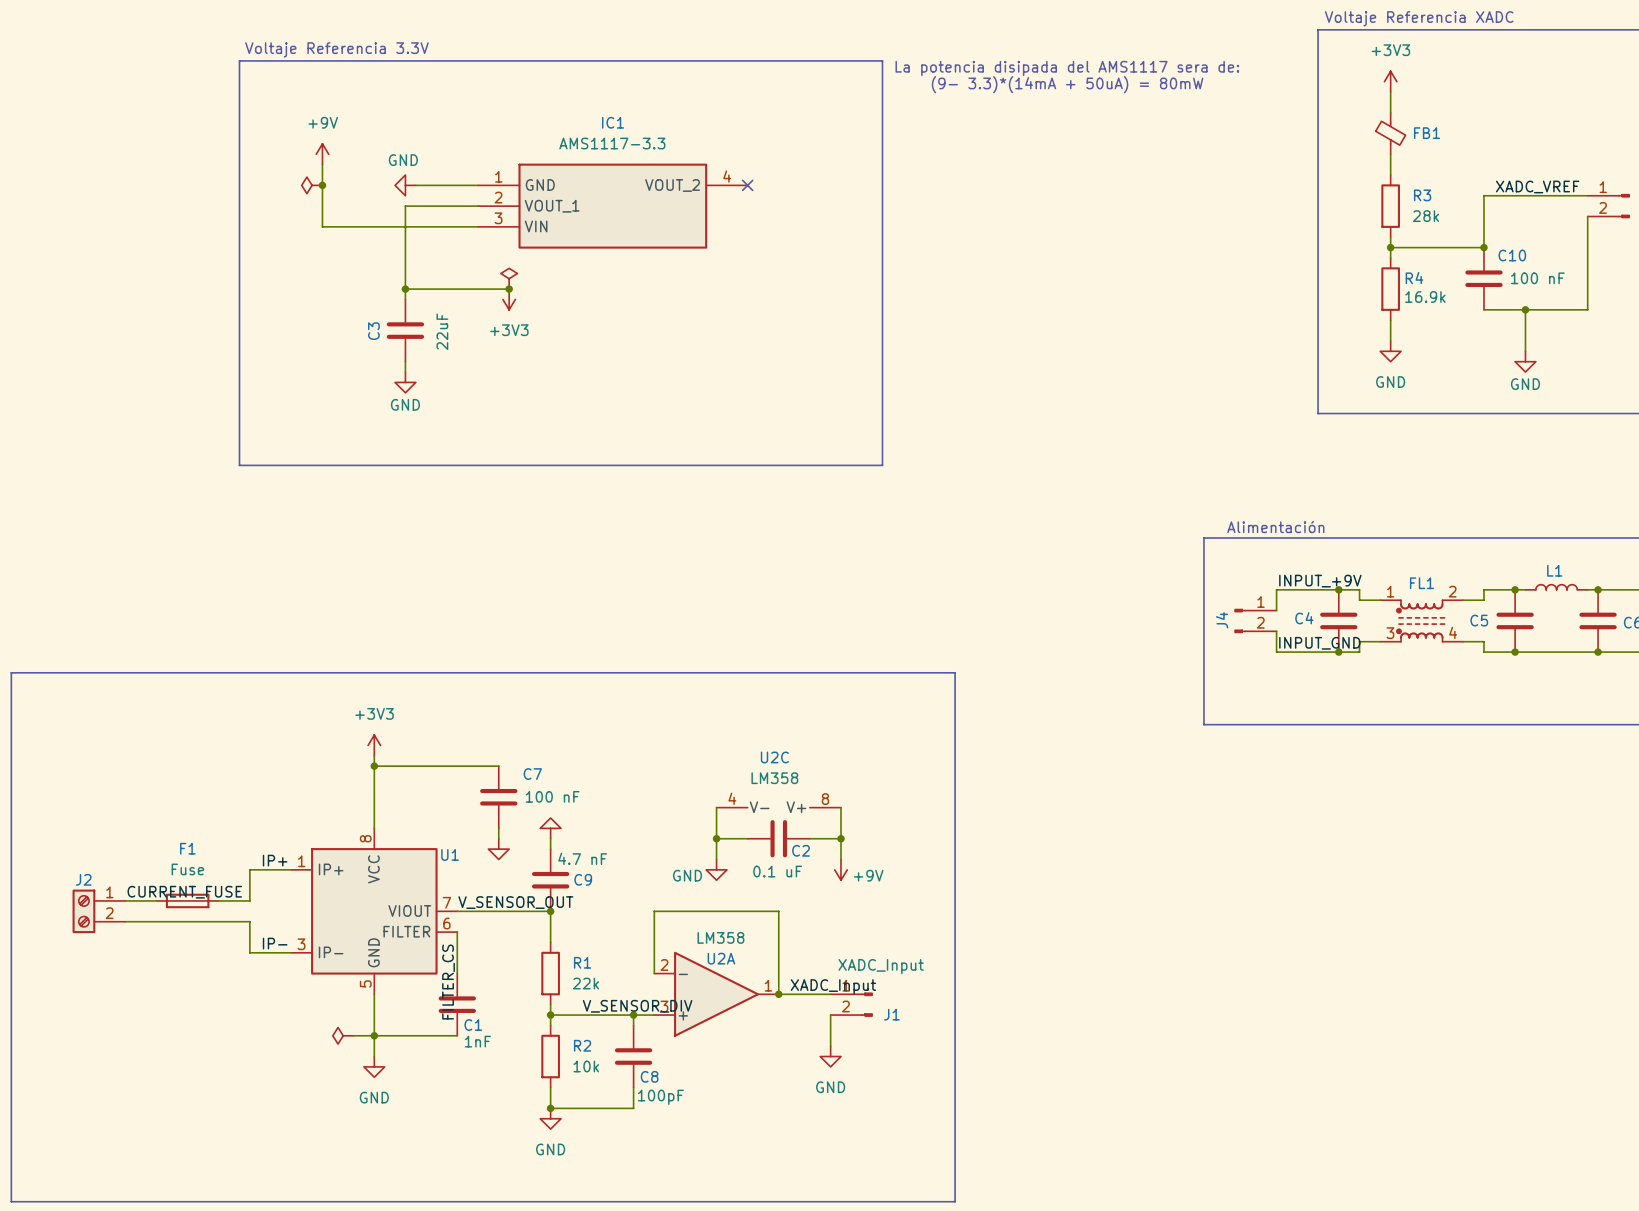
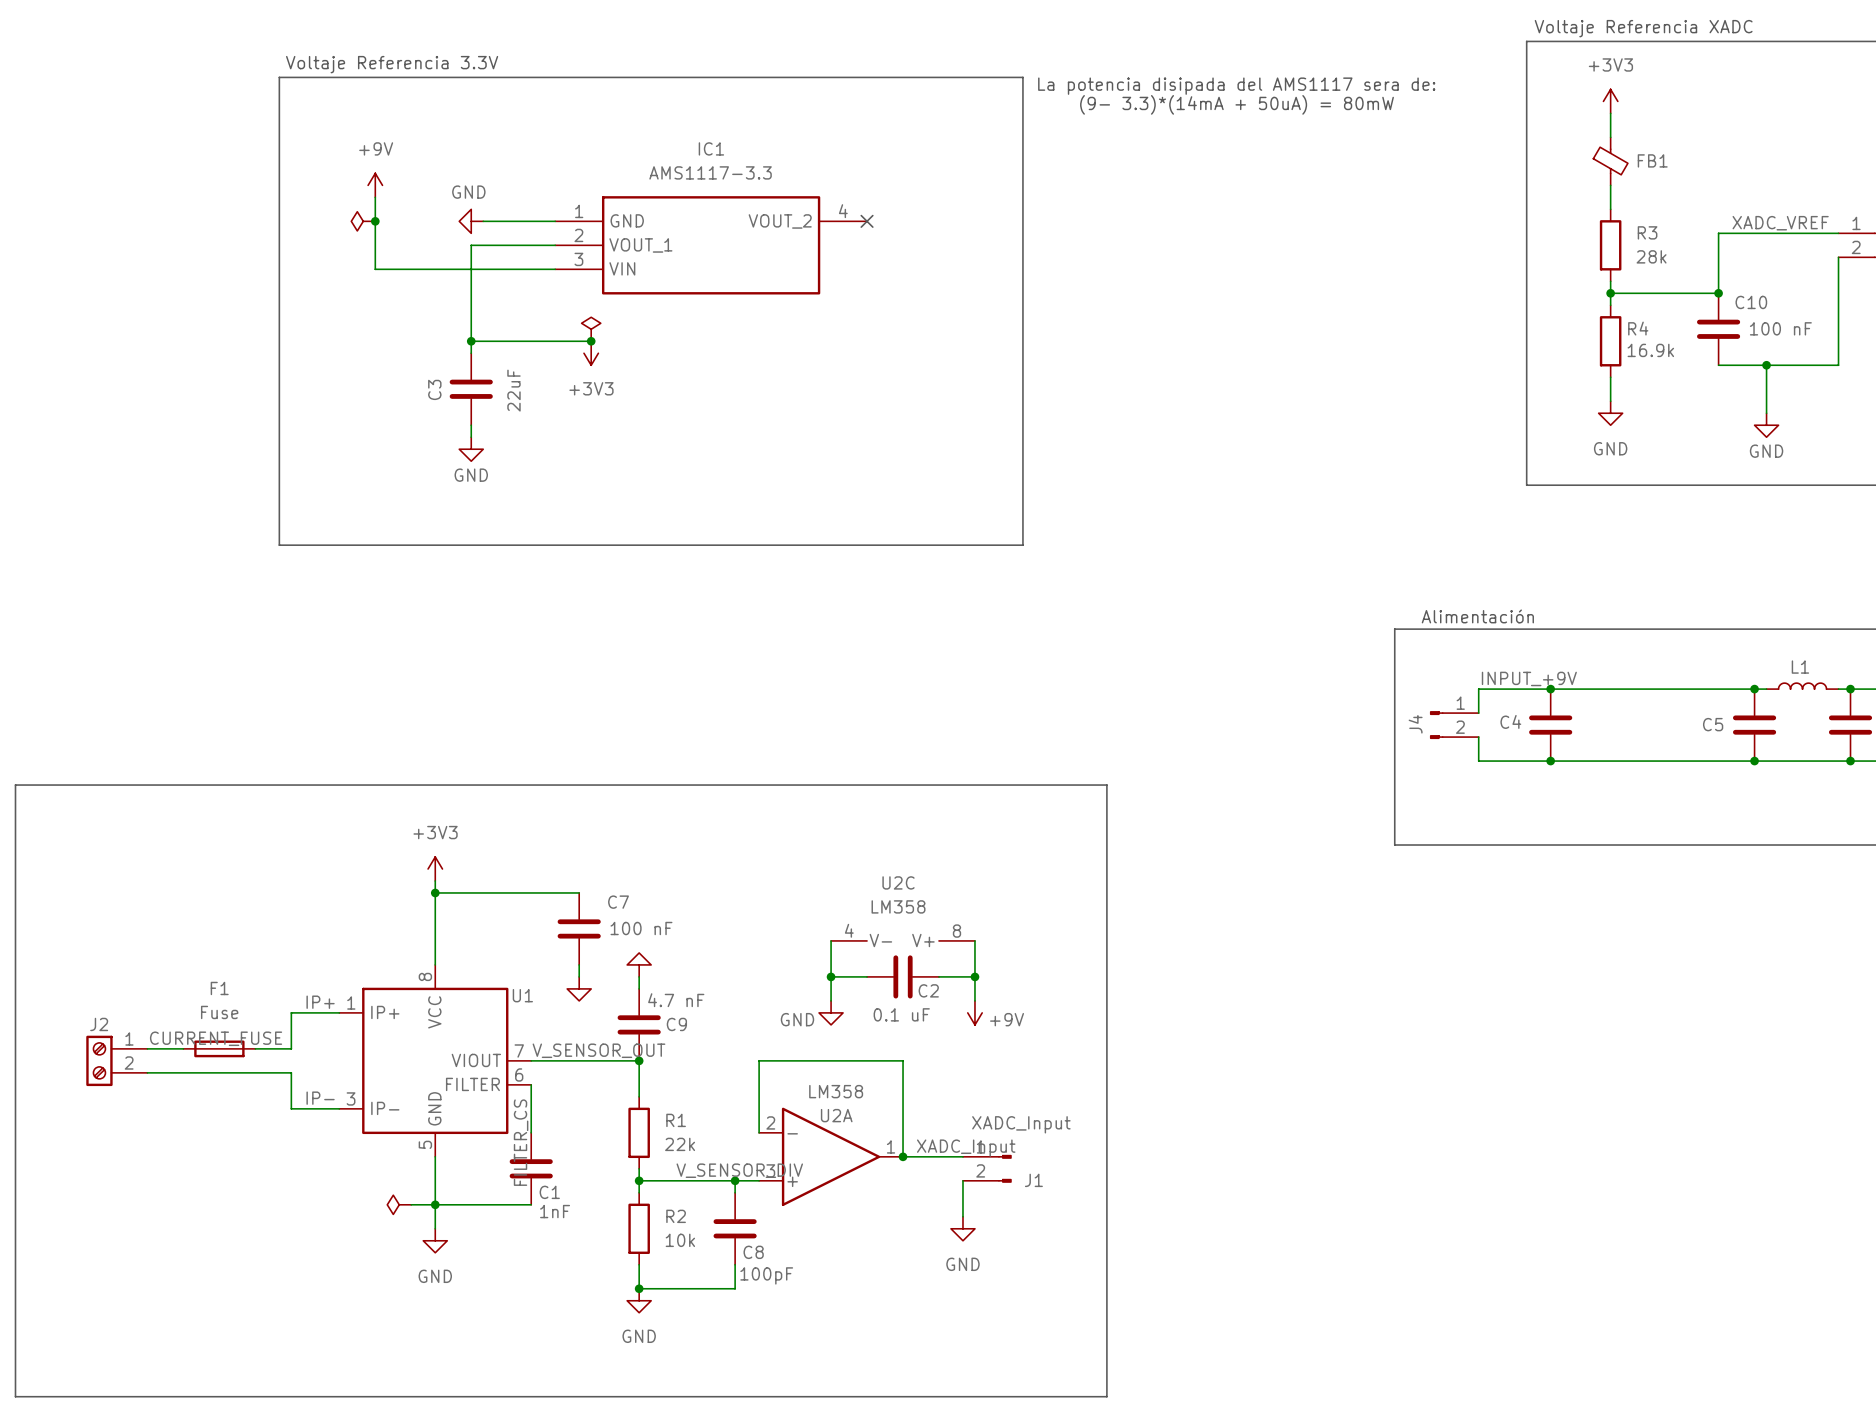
wire: (1359, 589) (1359, 600) (1380, 600) -> (1574, 689) (1718, 689)
wire: (1483, 589) (1483, 600) (1463, 600) -> none
FL1: (1421, 620) -> none
wire: (1380, 641) (1359, 641) (1359, 652) -> (1718, 761) (1574, 761)
wire: (1463, 641) (1483, 641) (1483, 652) -> none
label: INPUT_GND (1319, 643) -> none

